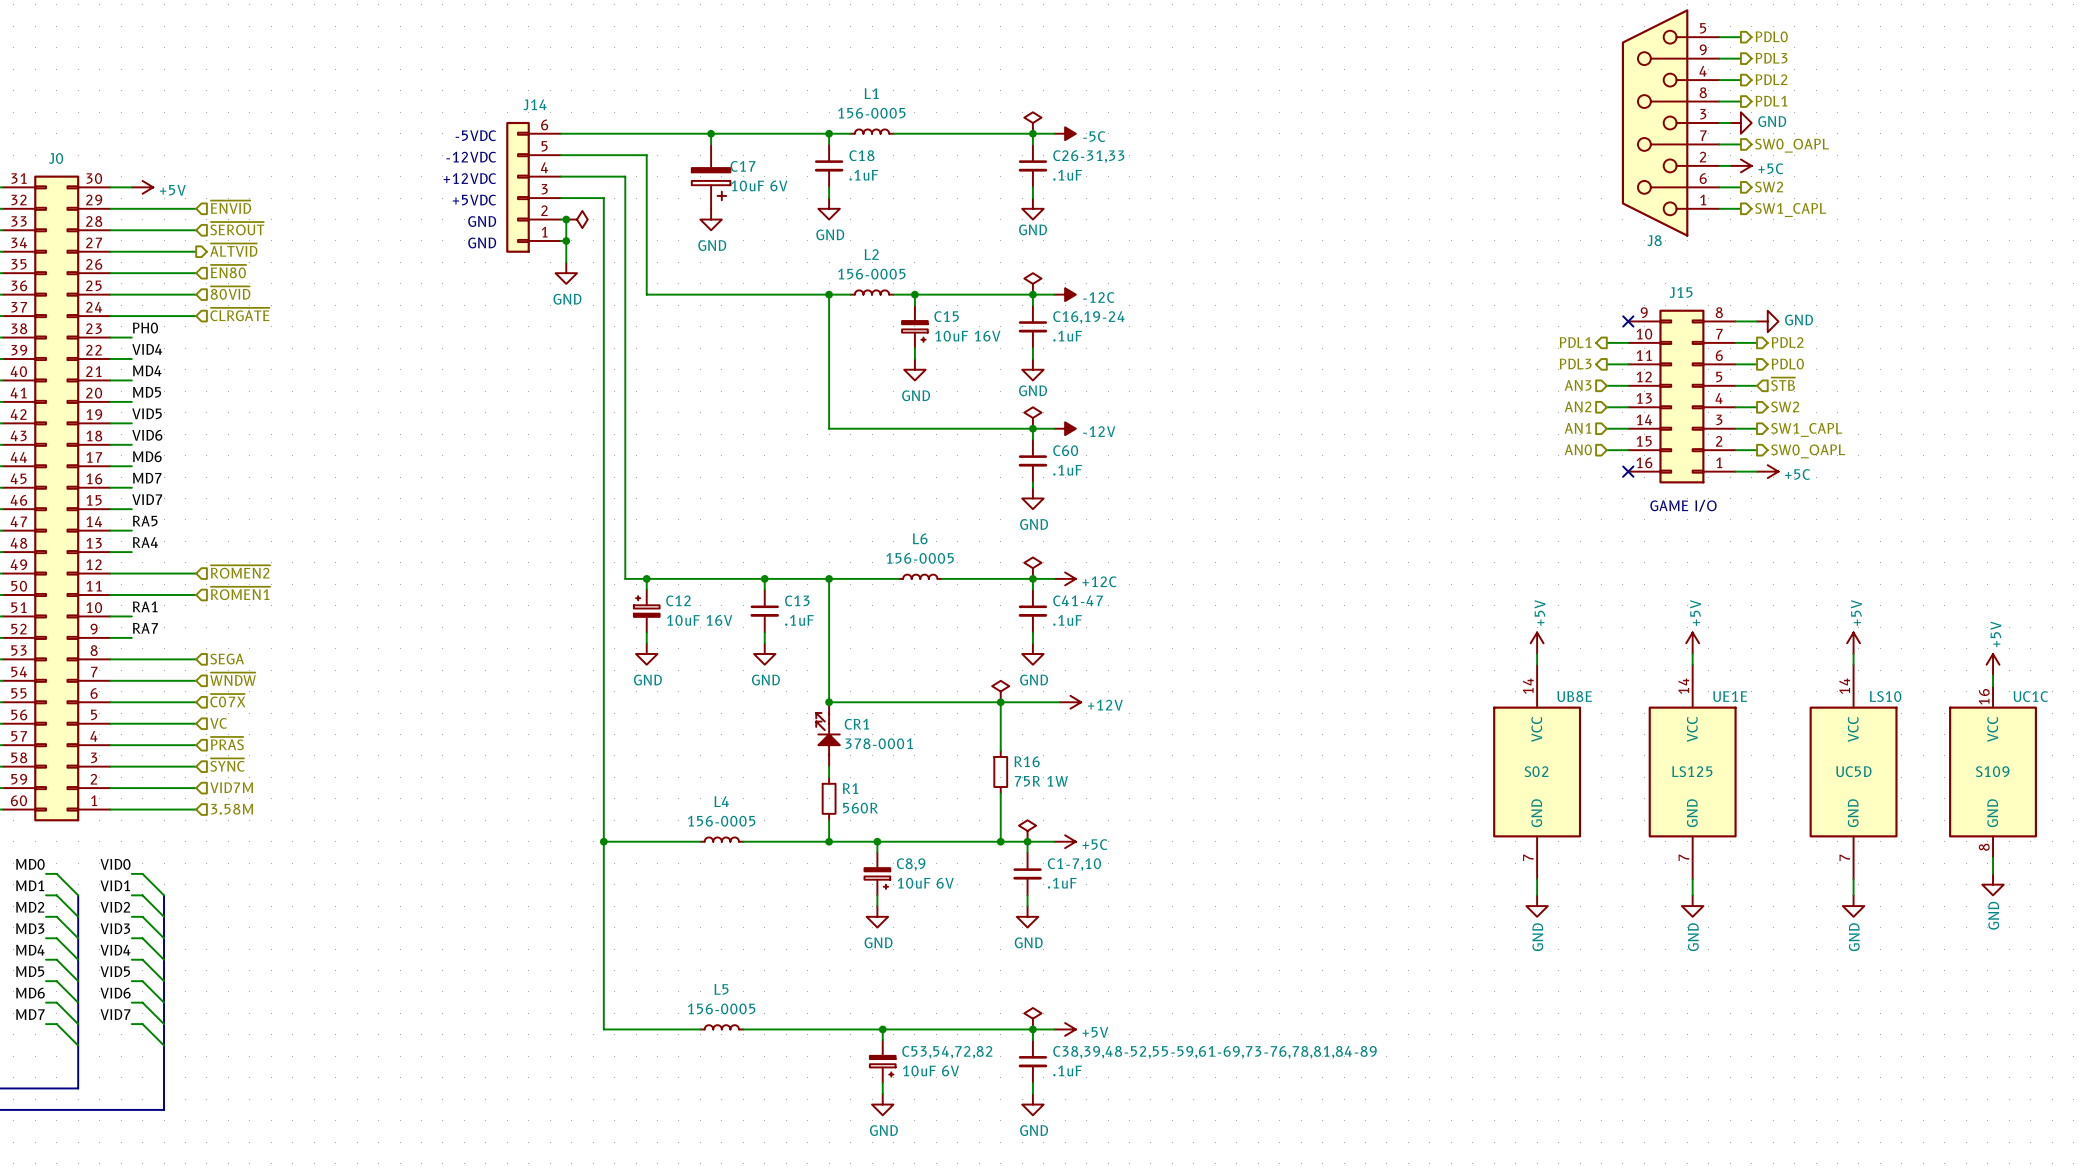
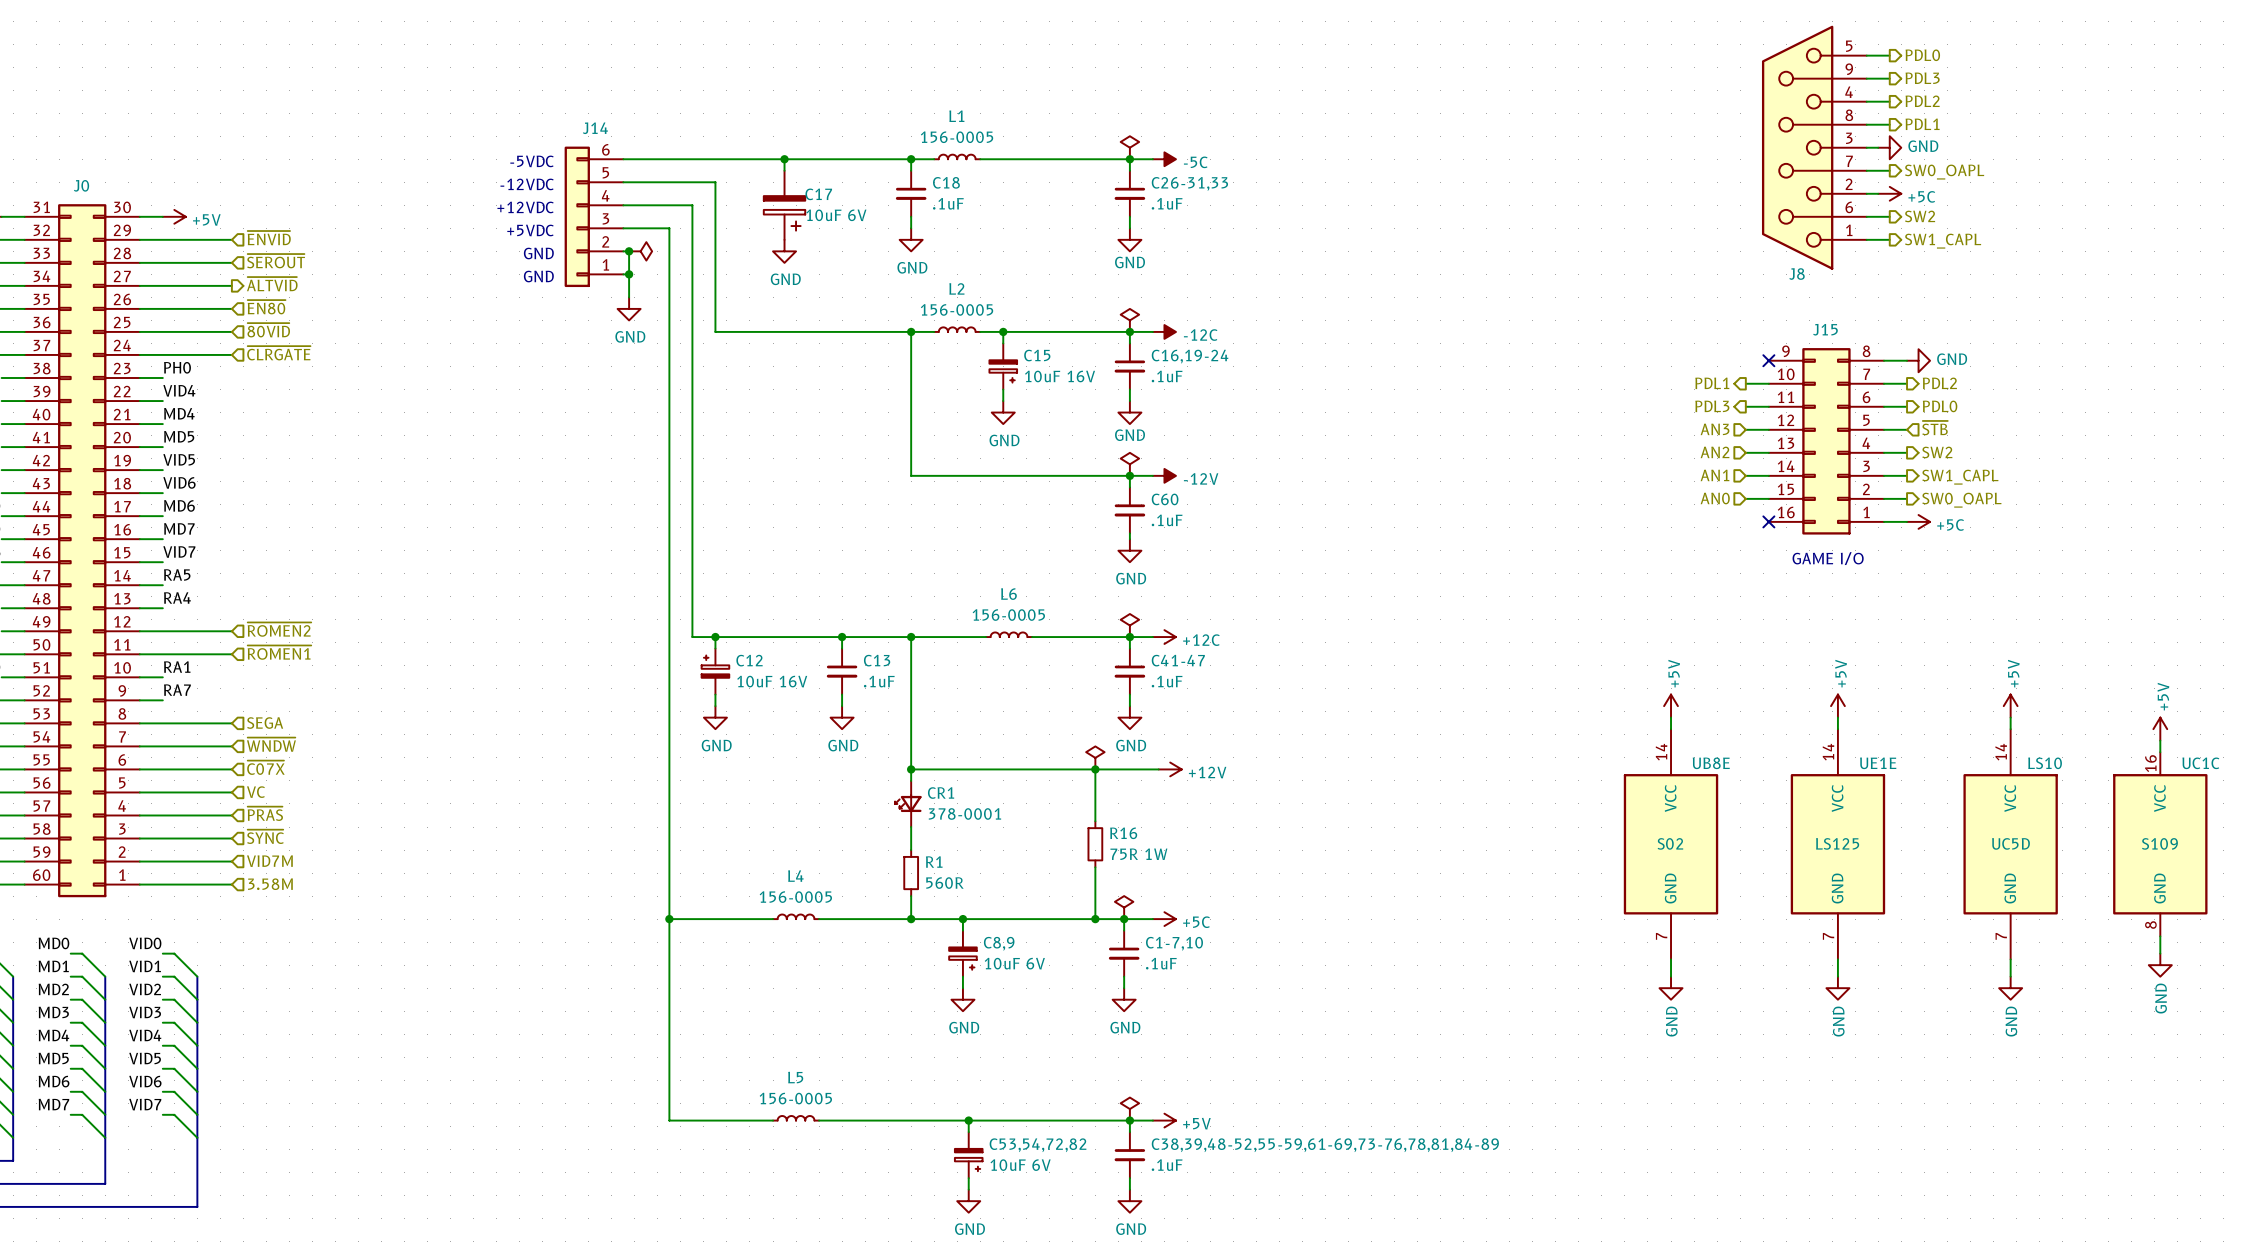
CR1 symbol: [816, 702, 840, 767] -> [895, 780, 922, 828]

